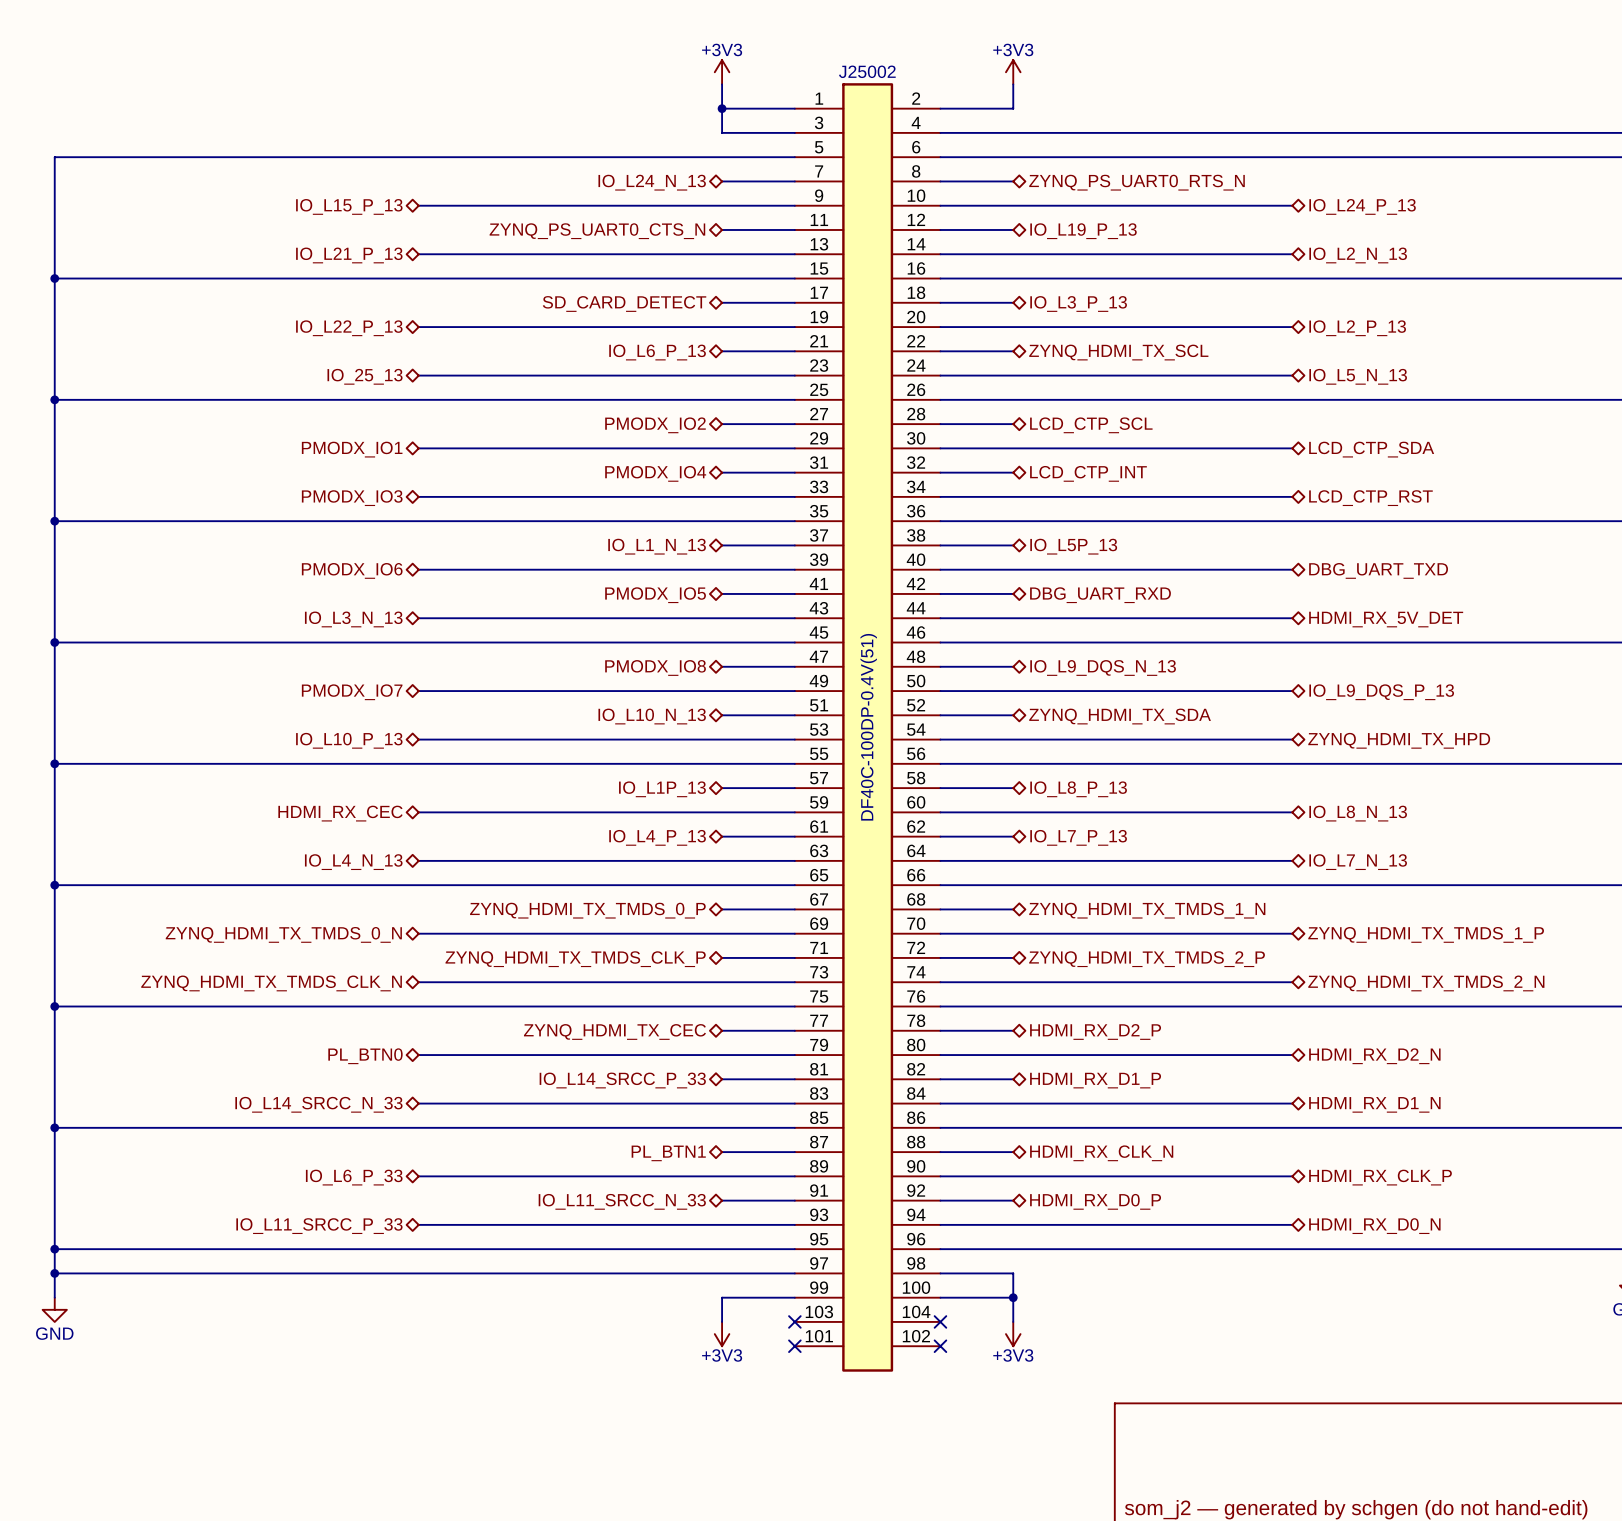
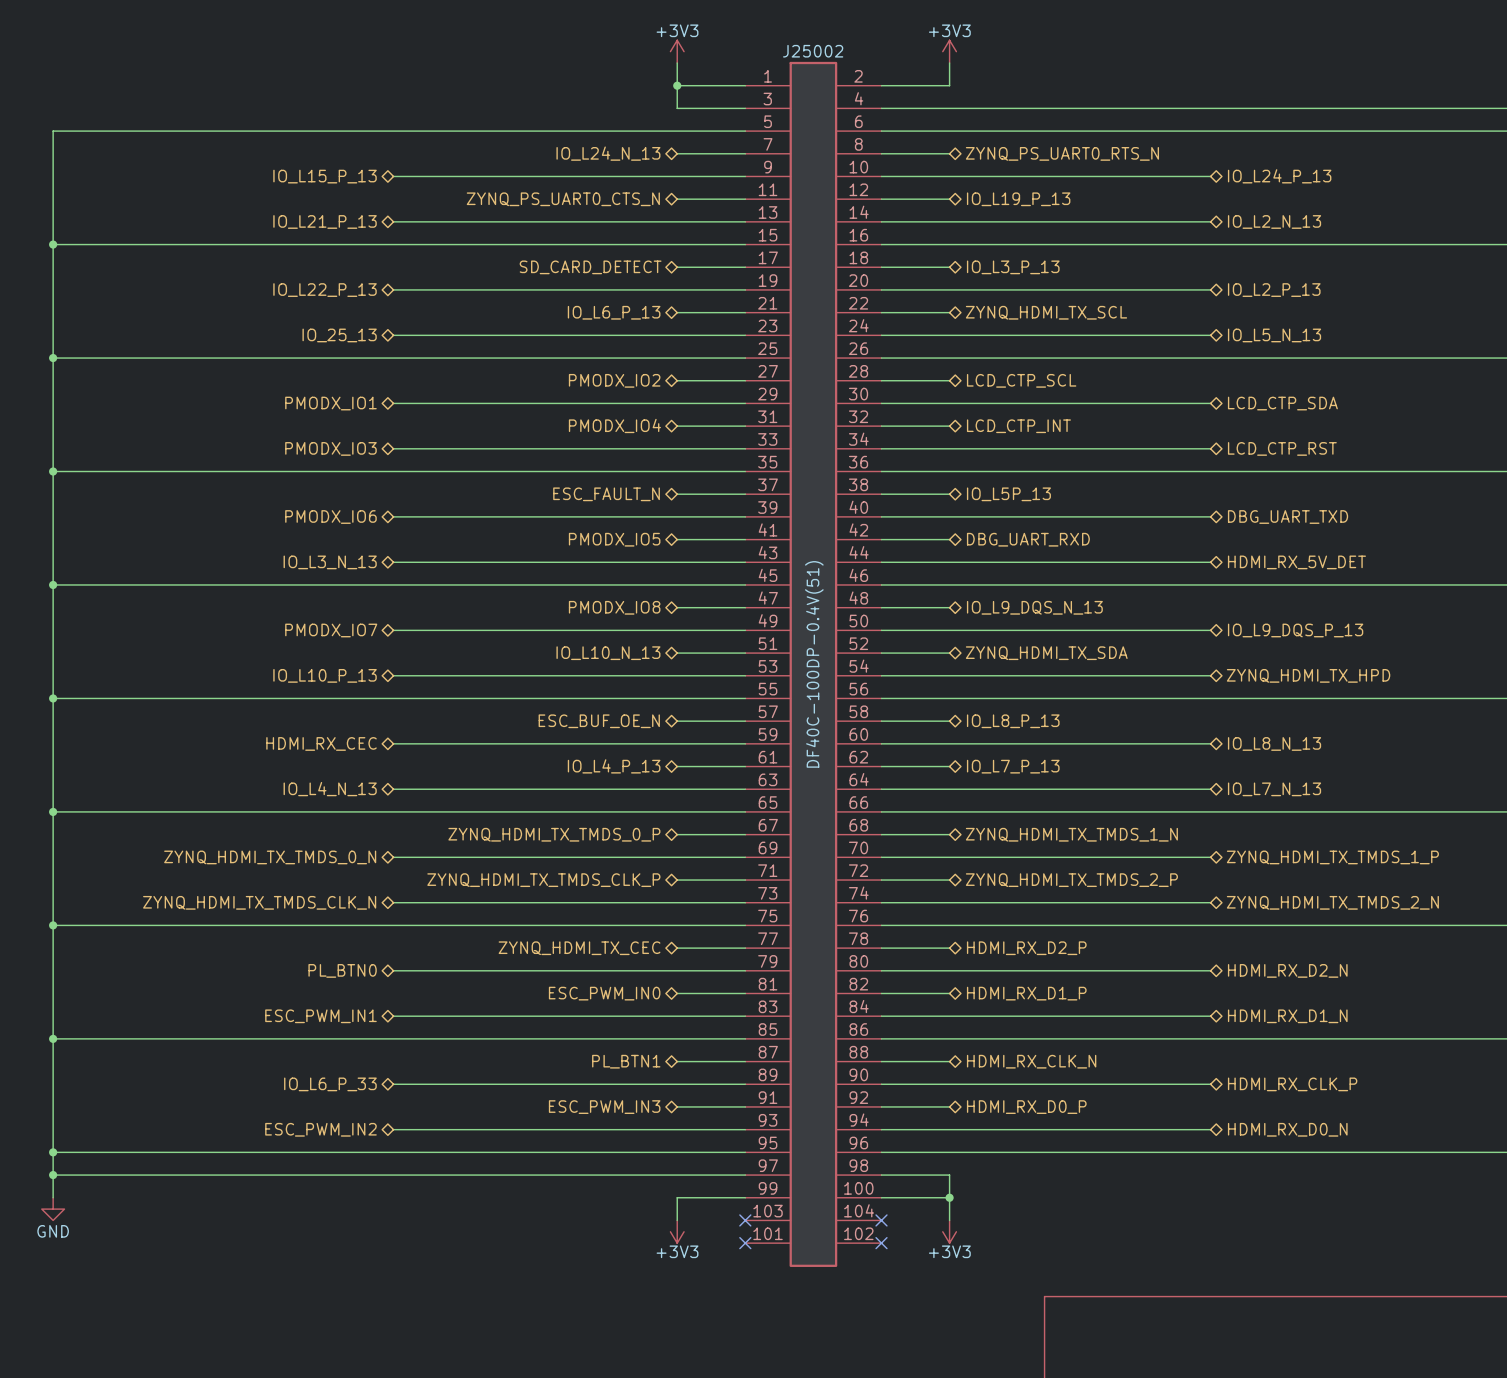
hierarchical label: IO_L1_N_13 (657, 546) -> ESC_FAULT_N (606, 494)
hierarchical label: IO_L1P_13 (662, 789) -> ESC_BUF_OE_N (599, 721)
hierarchical label: IO_L14_SRCC_P_33 (622, 1080) -> ESC_PWM_IN0 (604, 993)
hierarchical label: IO_L14_SRCC_N_33 (318, 1104) -> ESC_PWM_IN1 (320, 1016)
hierarchical label: IO_L11_SRCC_N_33 (622, 1201) -> ESC_PWM_IN3 (604, 1107)
hierarchical label: IO_L11_SRCC_P_33 (319, 1226) -> ESC_PWM_IN2 (320, 1129)

